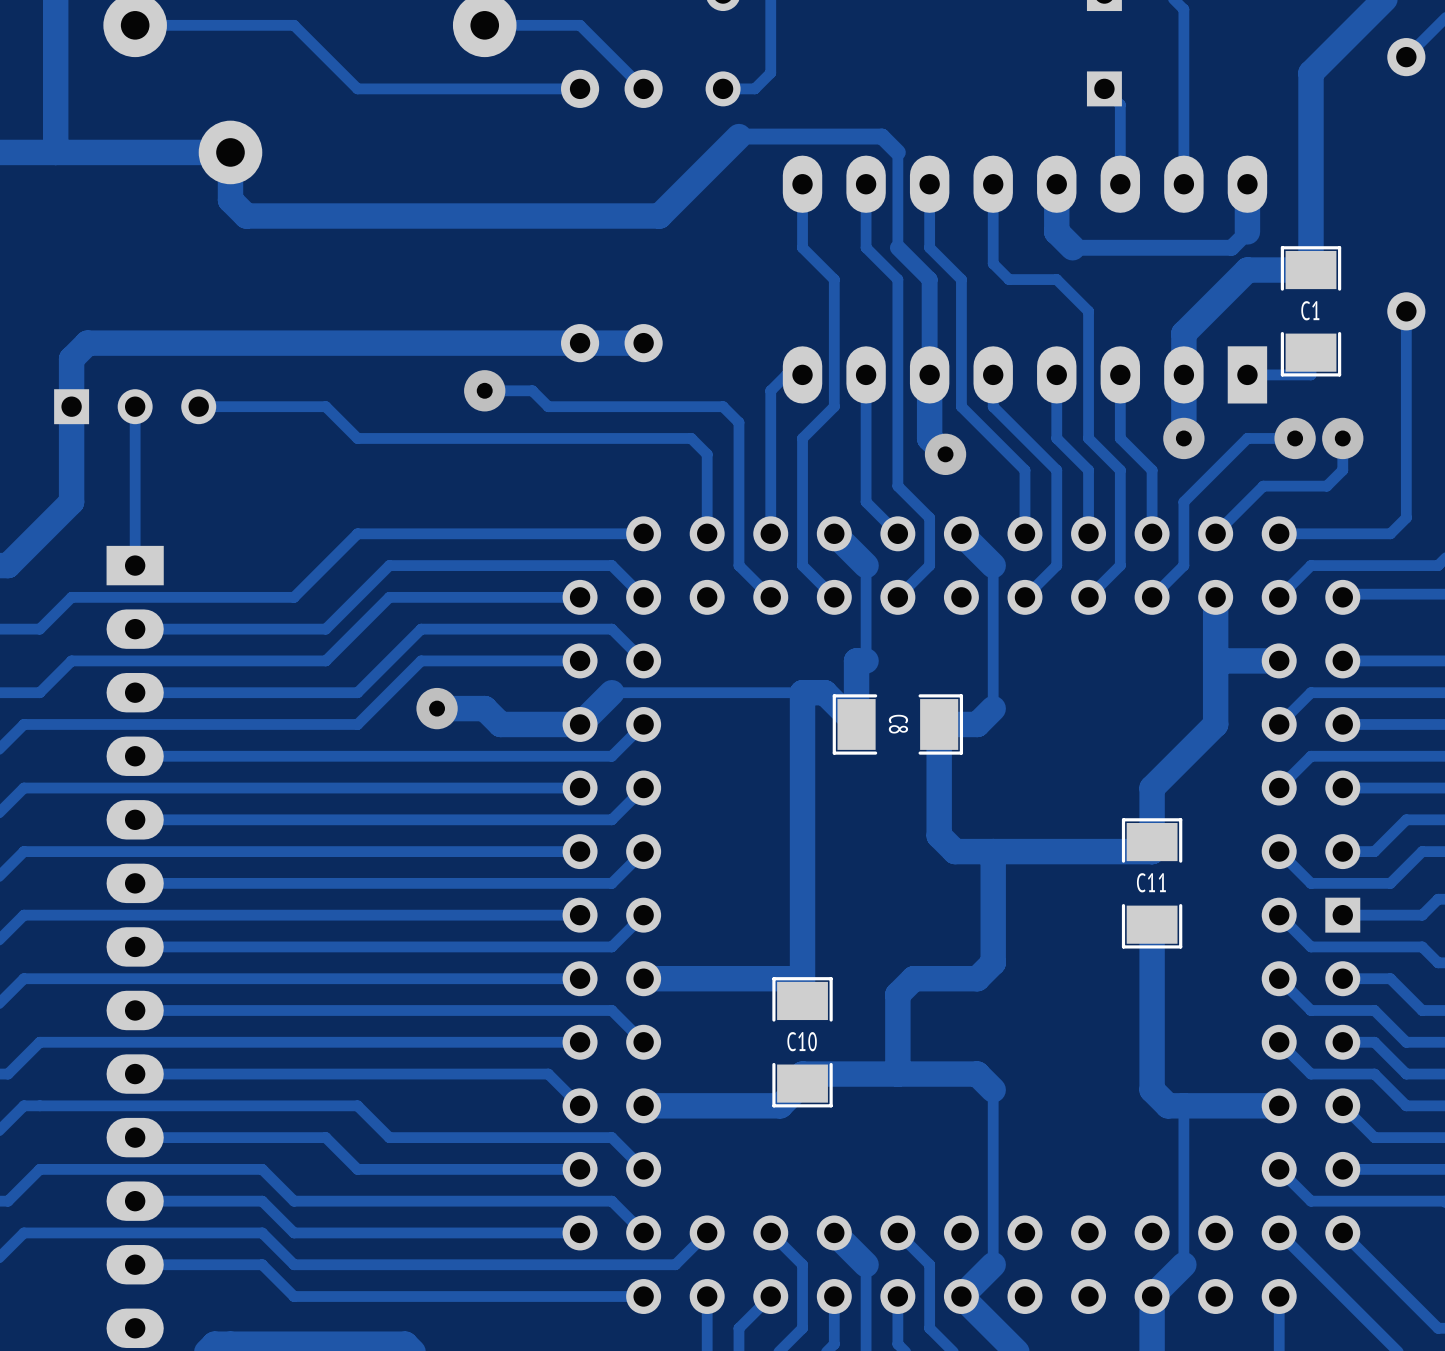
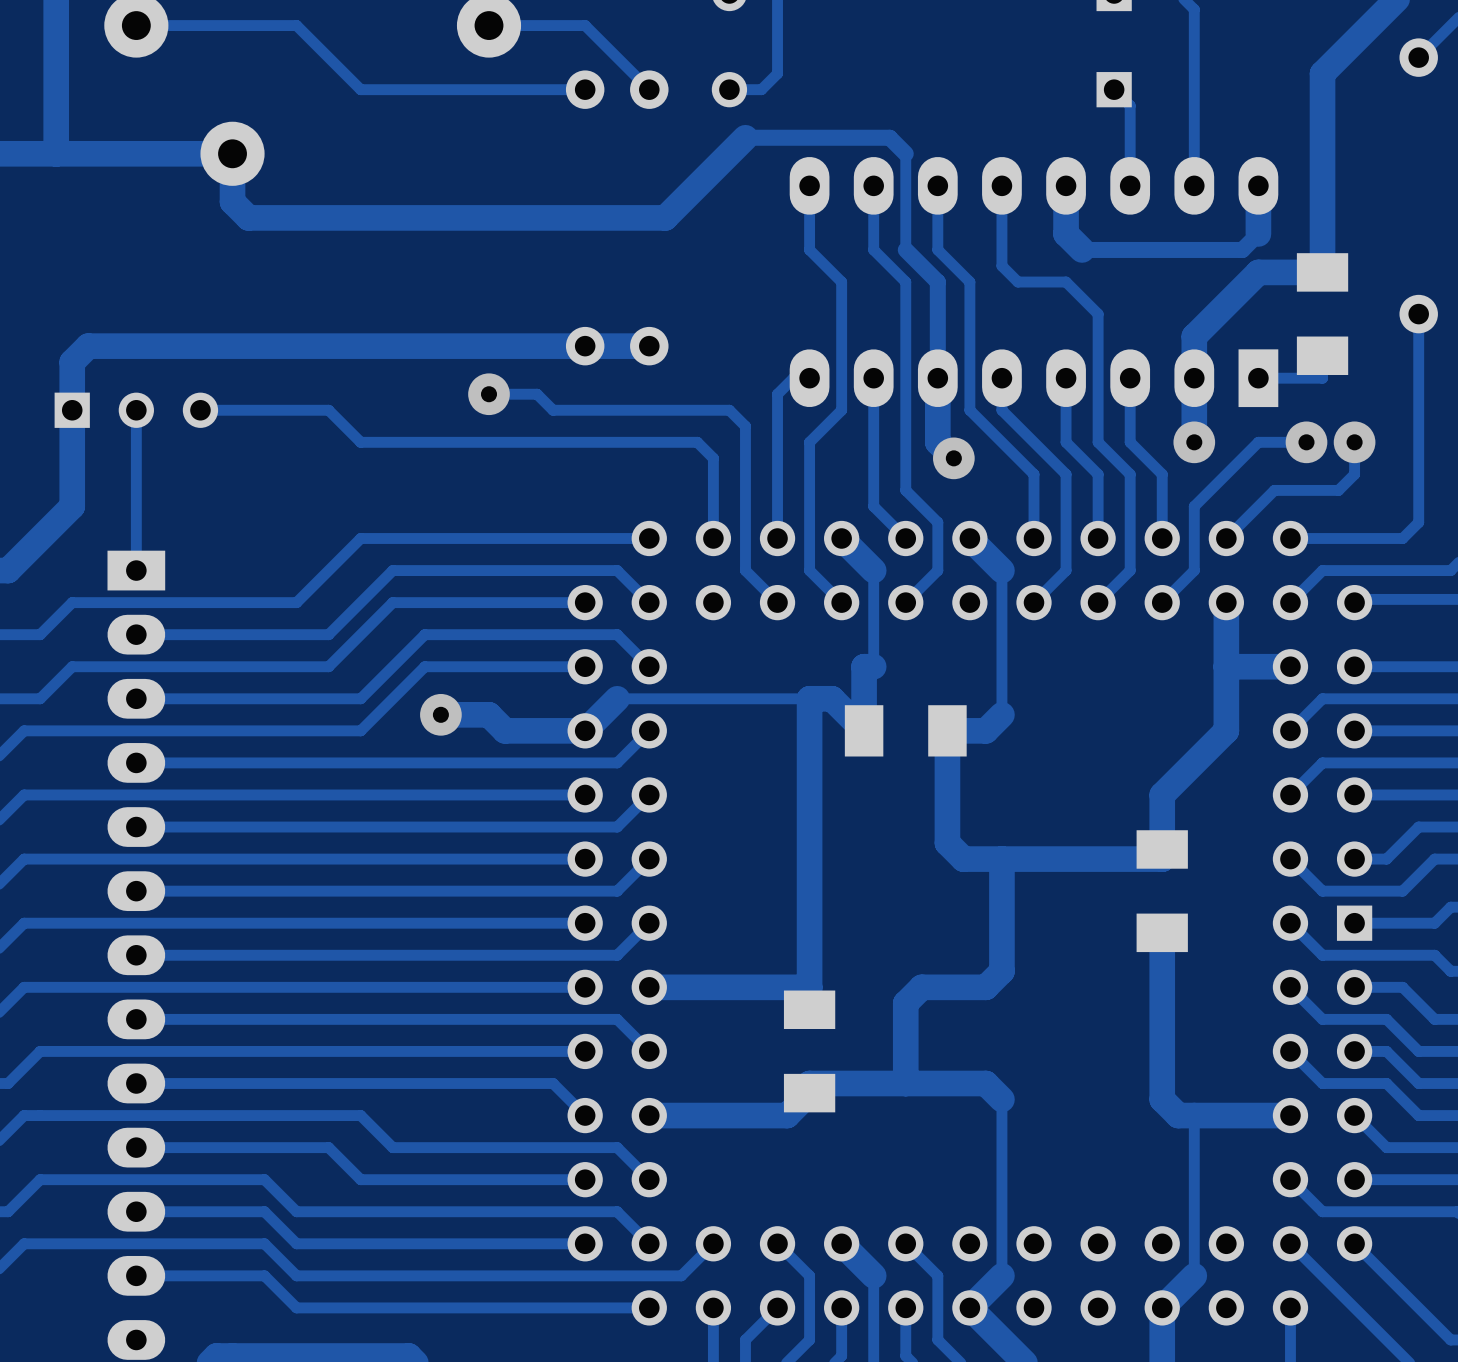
C1: (1311, 311) -> none
part: none -> (1322, 314)
C8: (897, 724) -> none
part: none -> (905, 730)
C11: (1152, 883) -> none
part: none -> (1162, 891)
C10: (802, 1042) -> none
part: none -> (809, 1051)

